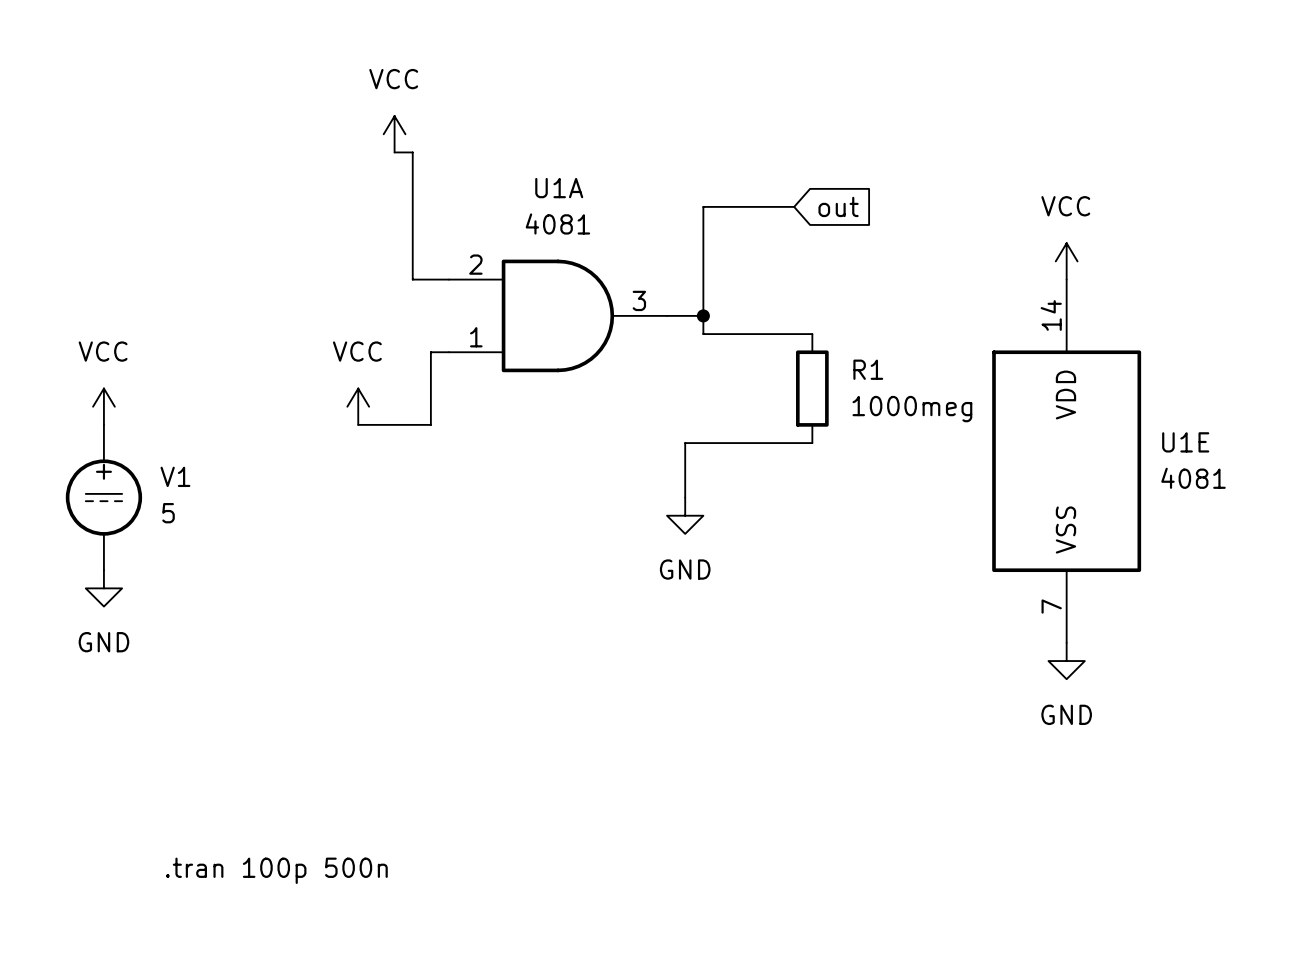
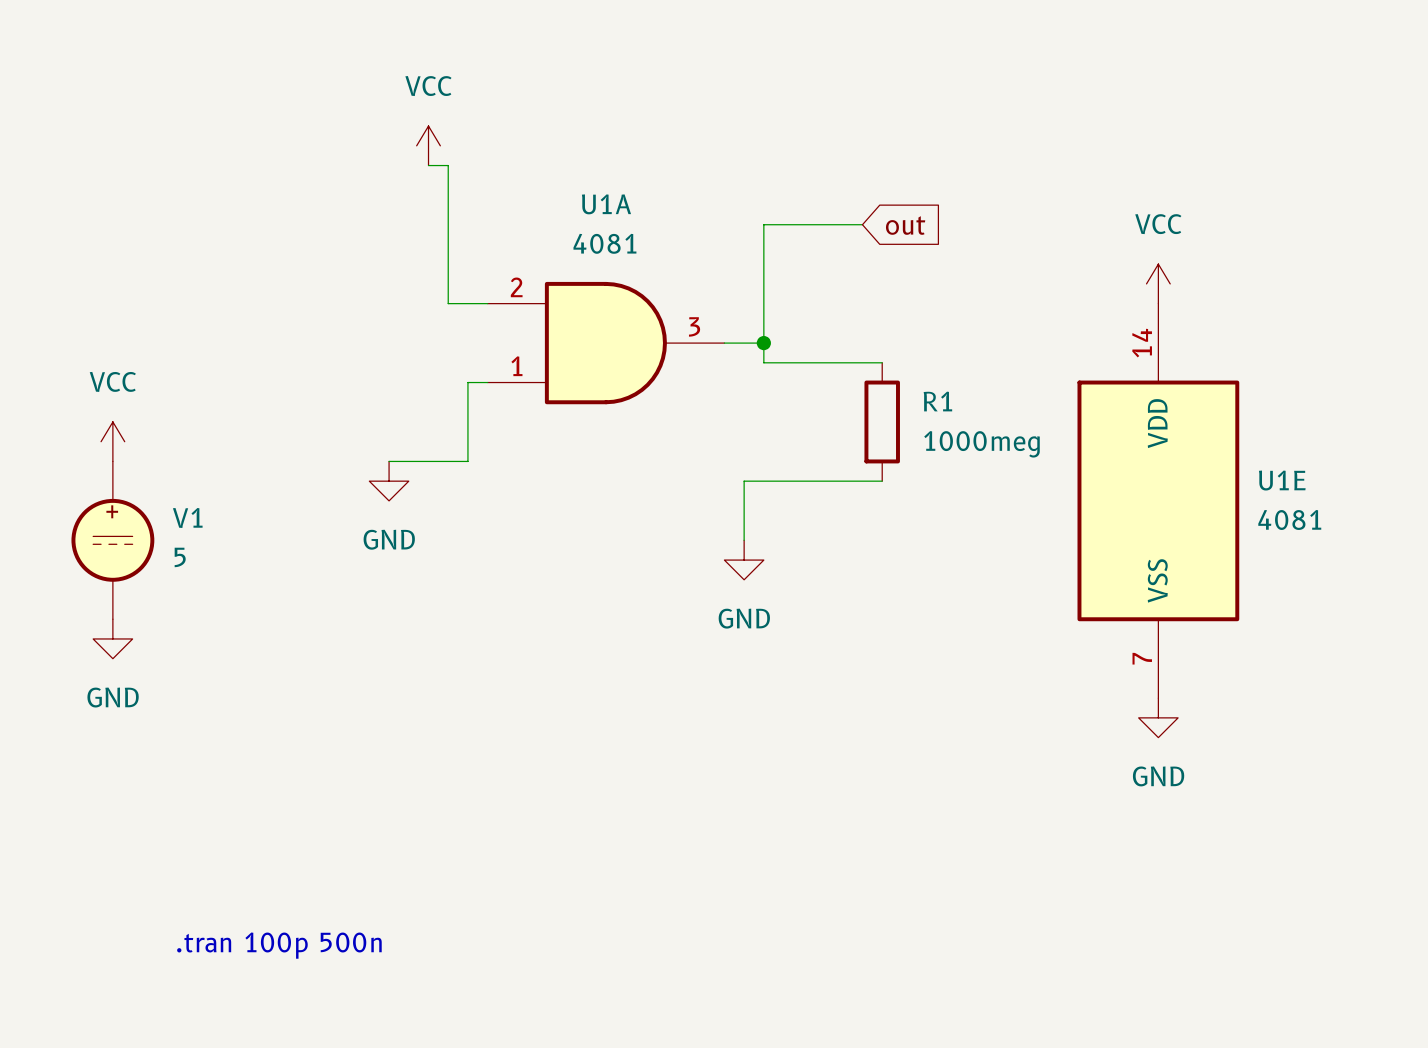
power symbol: VCC (358, 406) -> none
power symbol: none -> GND (389, 481)

